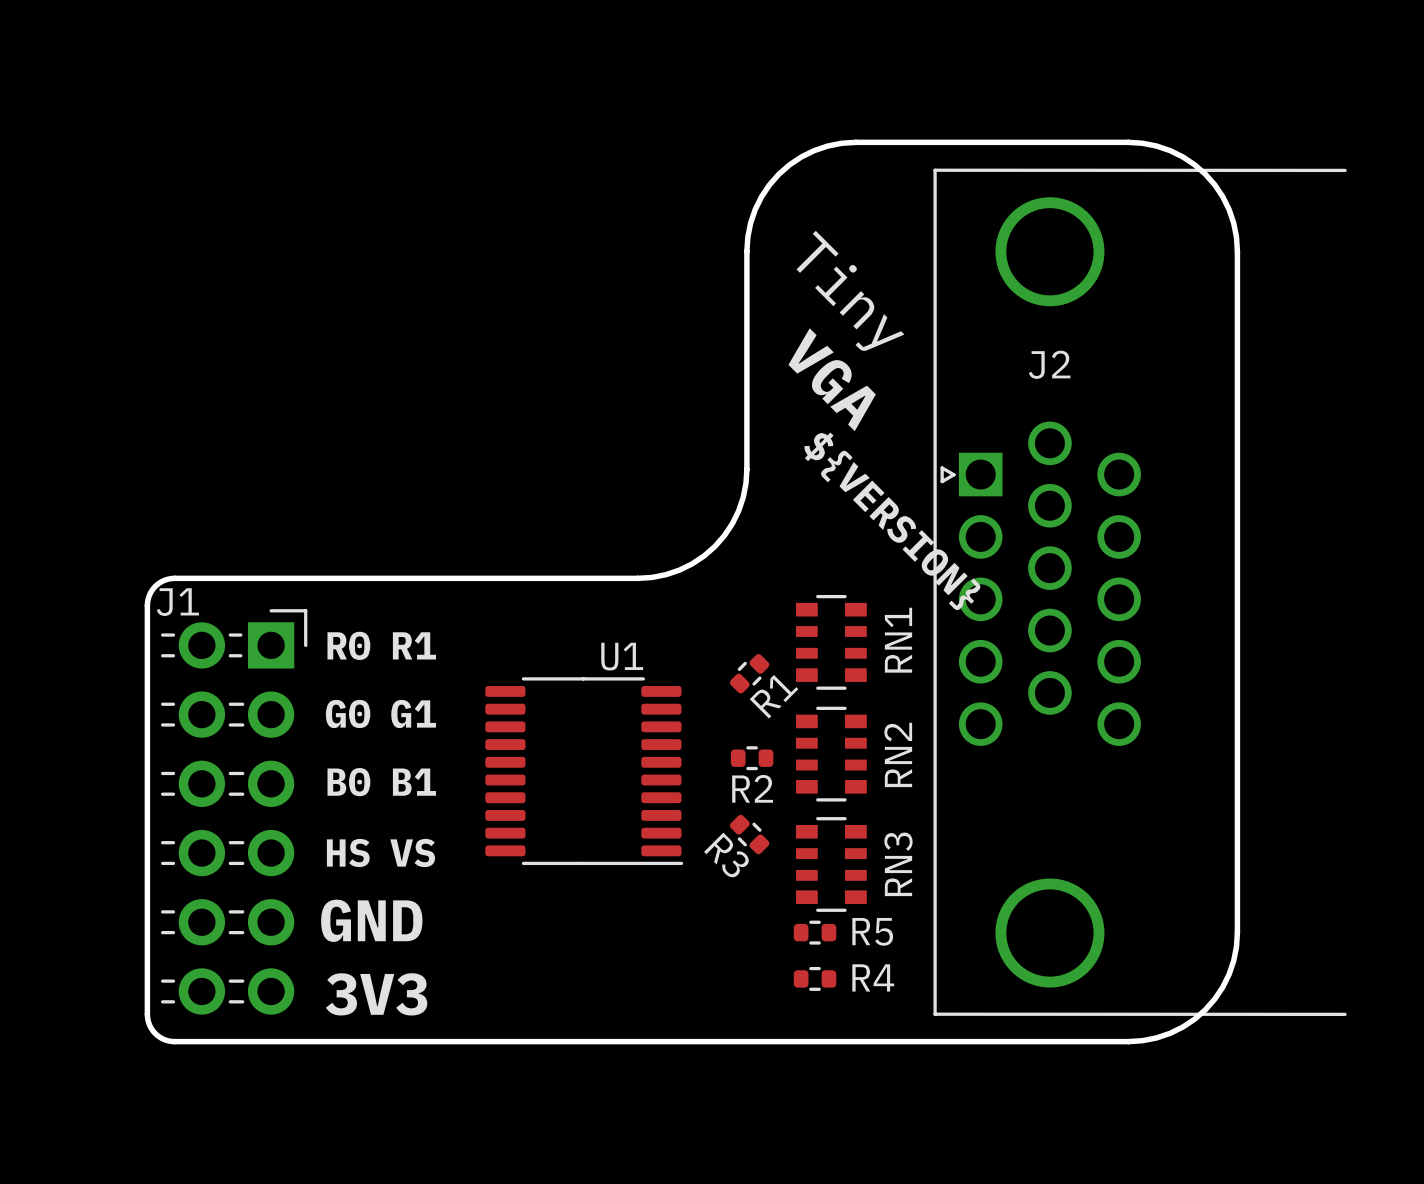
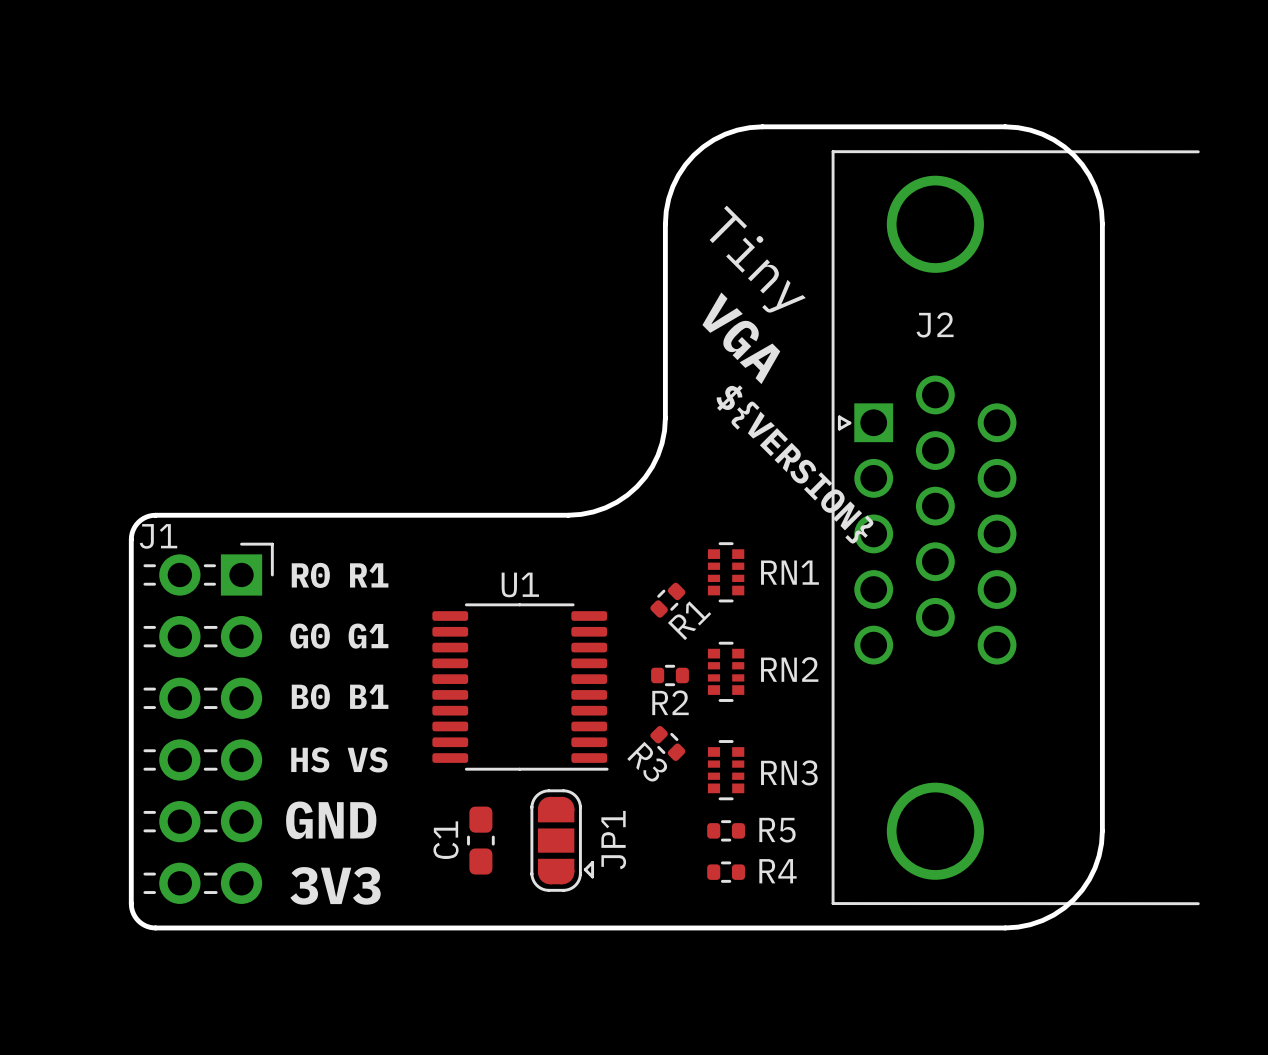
RN1 footprint: [795, 594, 867, 690] -> [707, 542, 745, 603]
U1 name position: U1 (622, 656) -> U1 (520, 584)
RN2 footprint: [795, 706, 867, 802] -> [707, 641, 745, 702]
RN3 footprint: [795, 817, 867, 912] -> [707, 740, 745, 801]
C1: none -> (480, 840)
JP1: none -> (562, 840)

